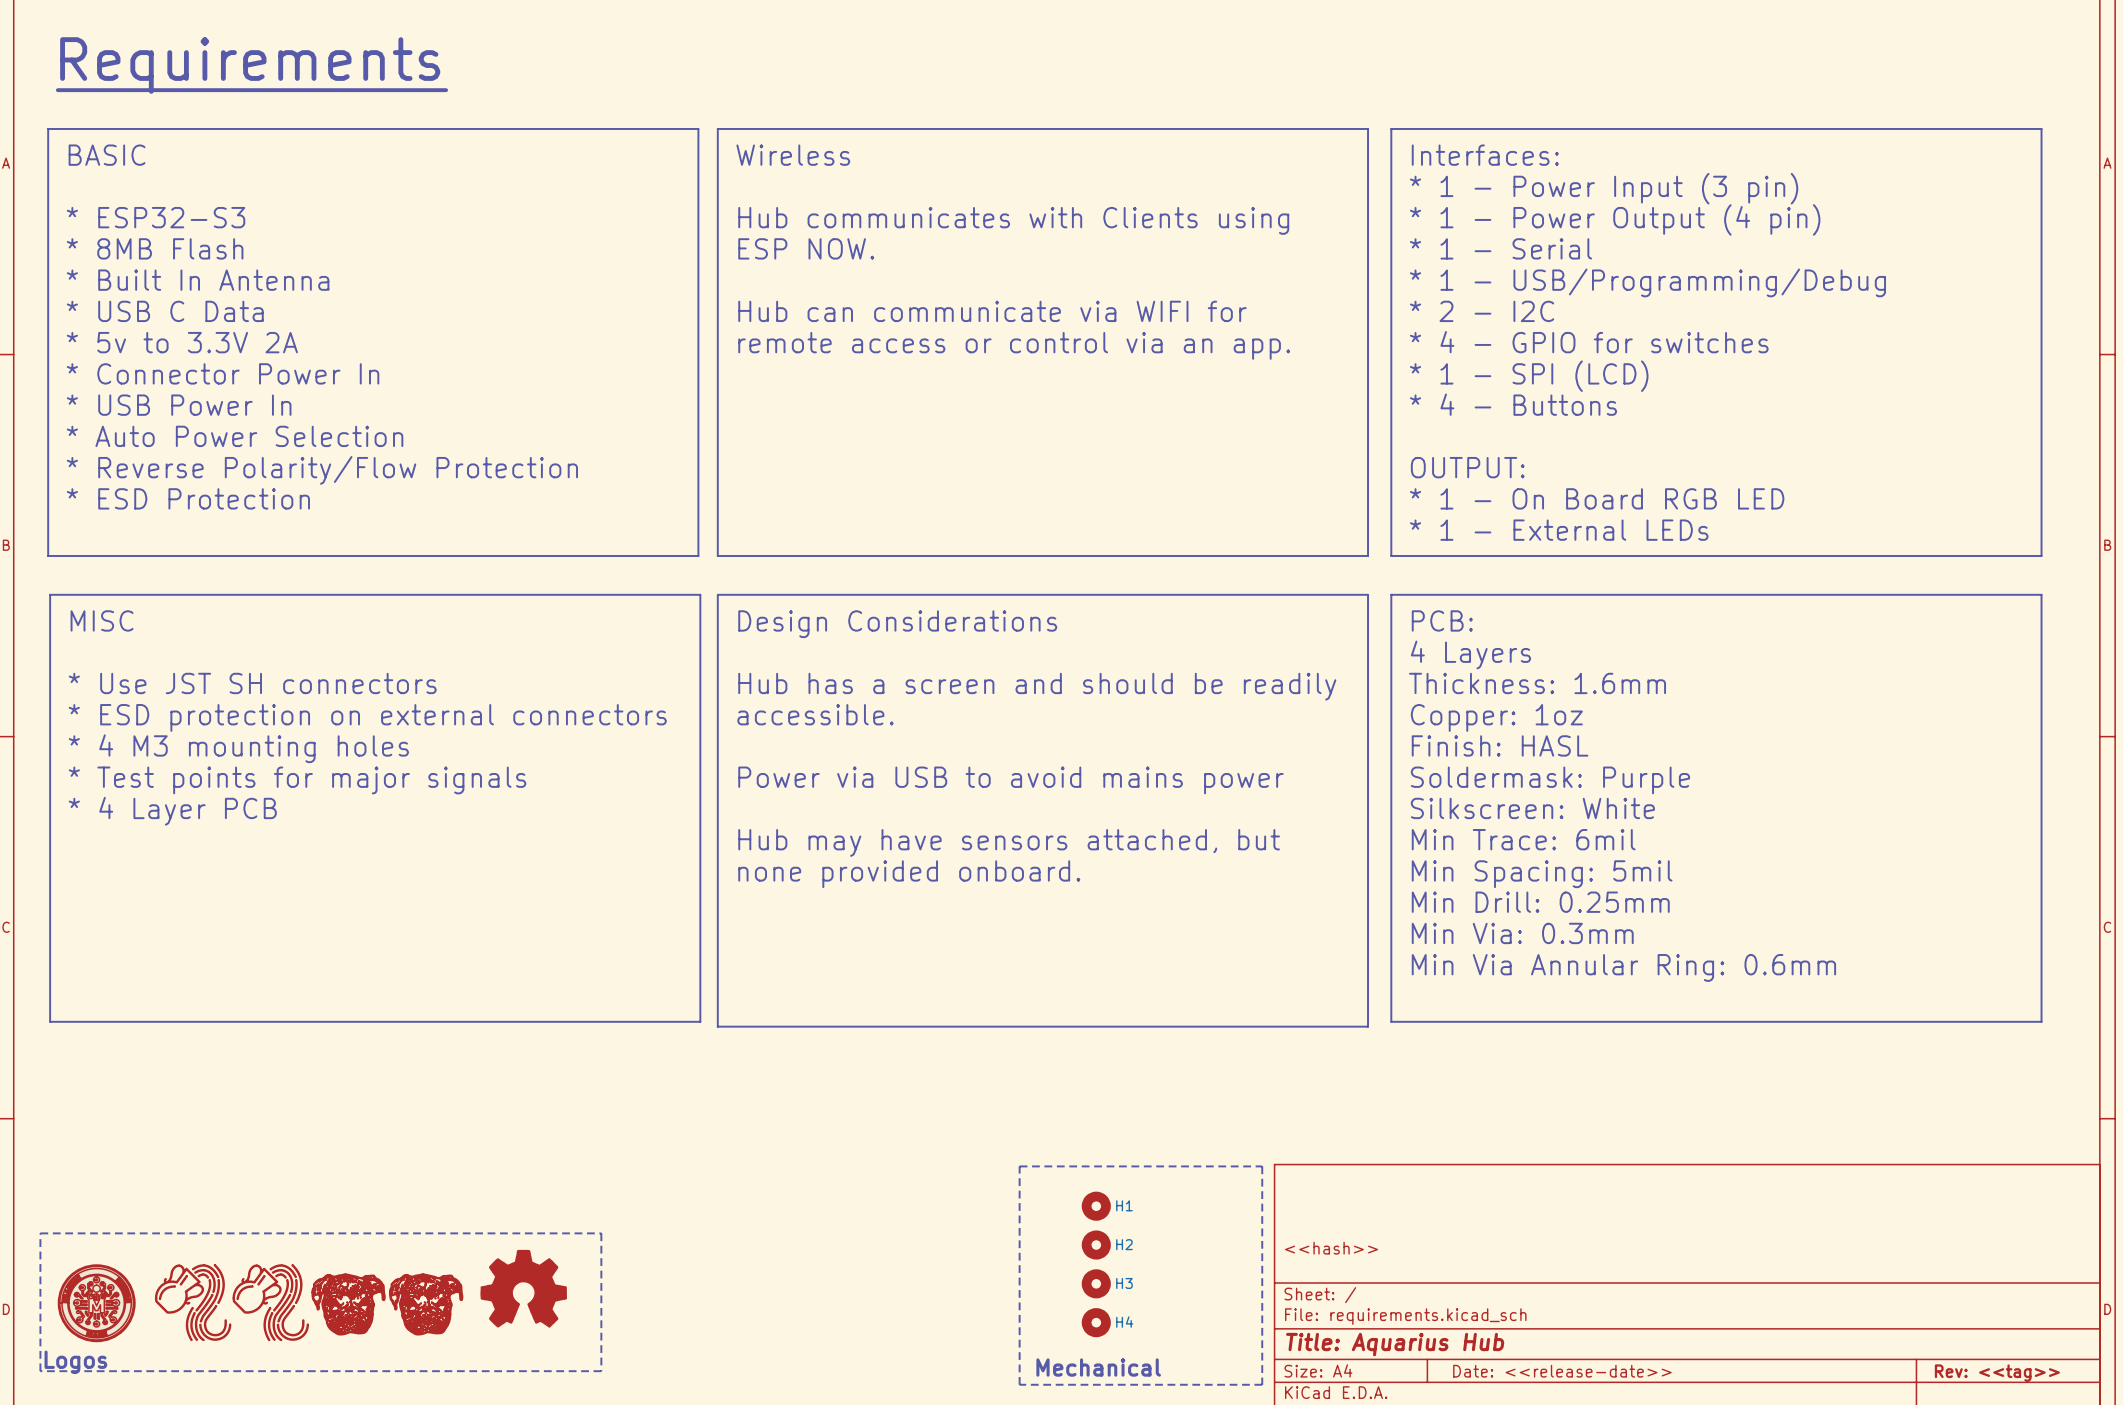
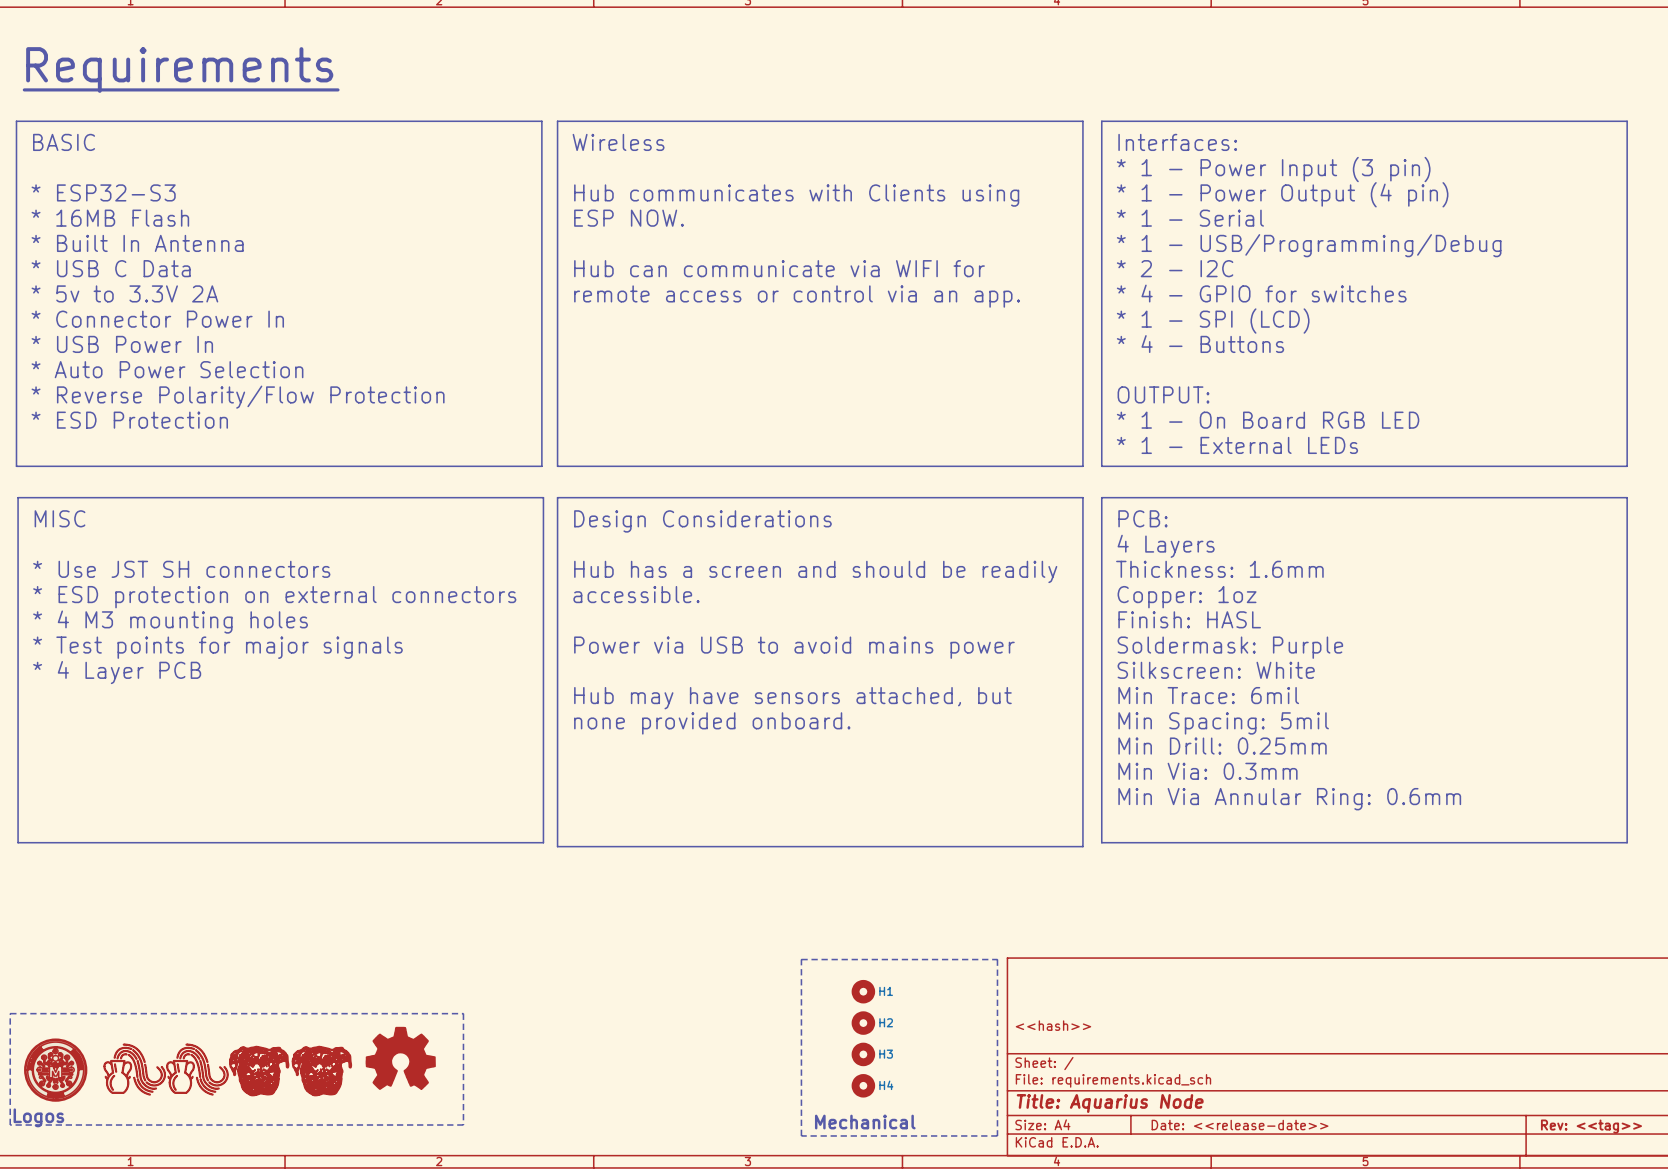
text: * 8MB Flash (155, 248) -> * 16MB Flash (110, 218)
part symbol: [155, 1264, 231, 1341] -> [103, 1044, 166, 1096]
part symbol: [233, 1264, 309, 1341] -> [166, 1044, 229, 1096]
title block: Title: Aquarius Hub (1395, 1344) -> Title: Aquarius Node (1110, 1103)

